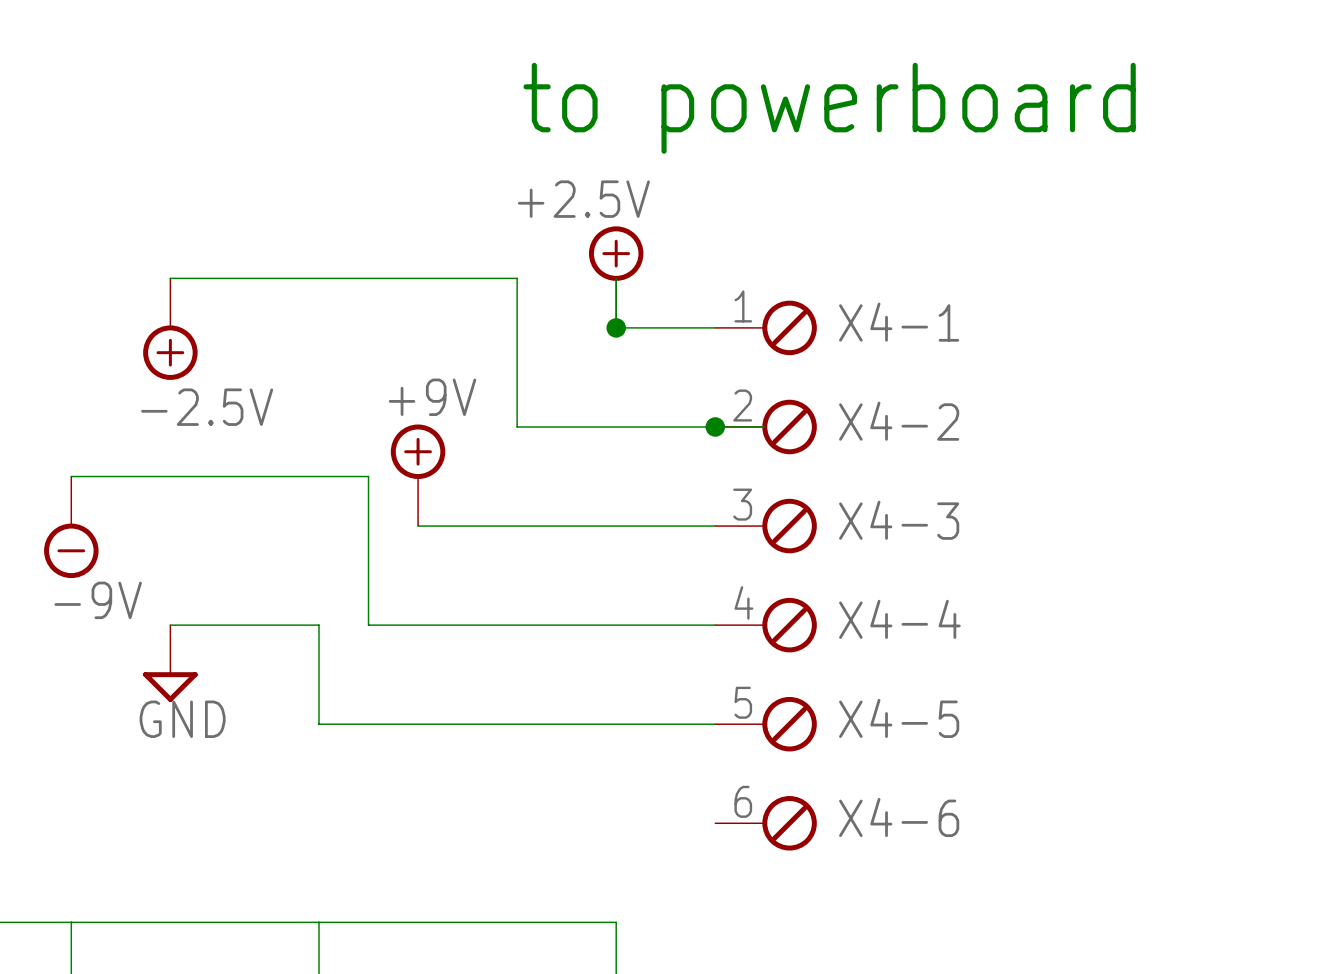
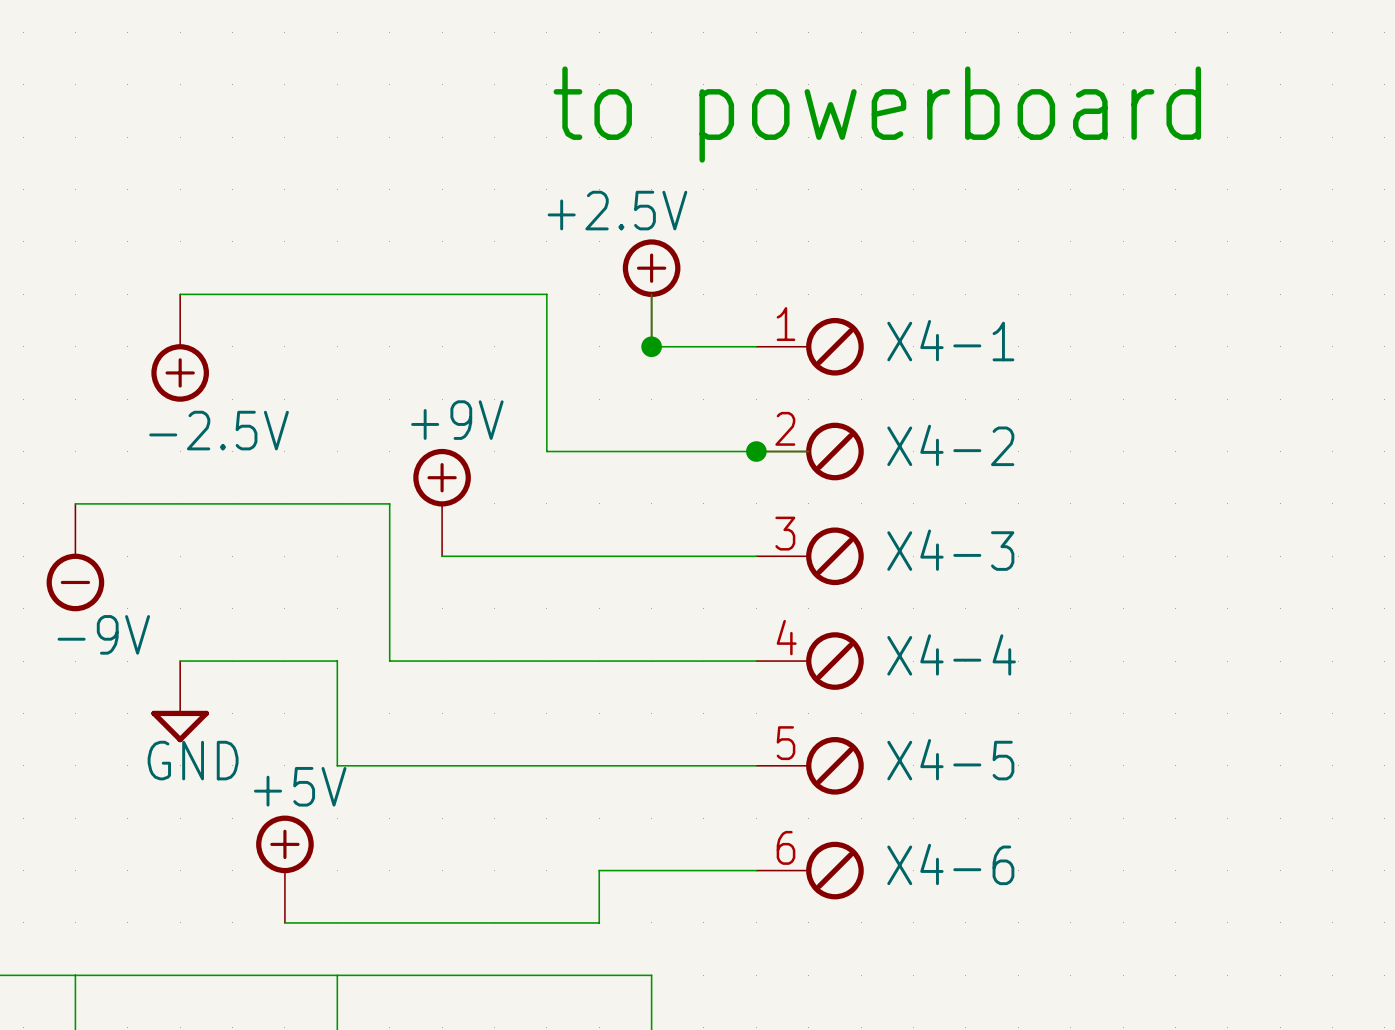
power symbol: none -> +5V (284, 869)
wire: none -> (756, 870) (599, 870) (599, 922) (284, 922)

